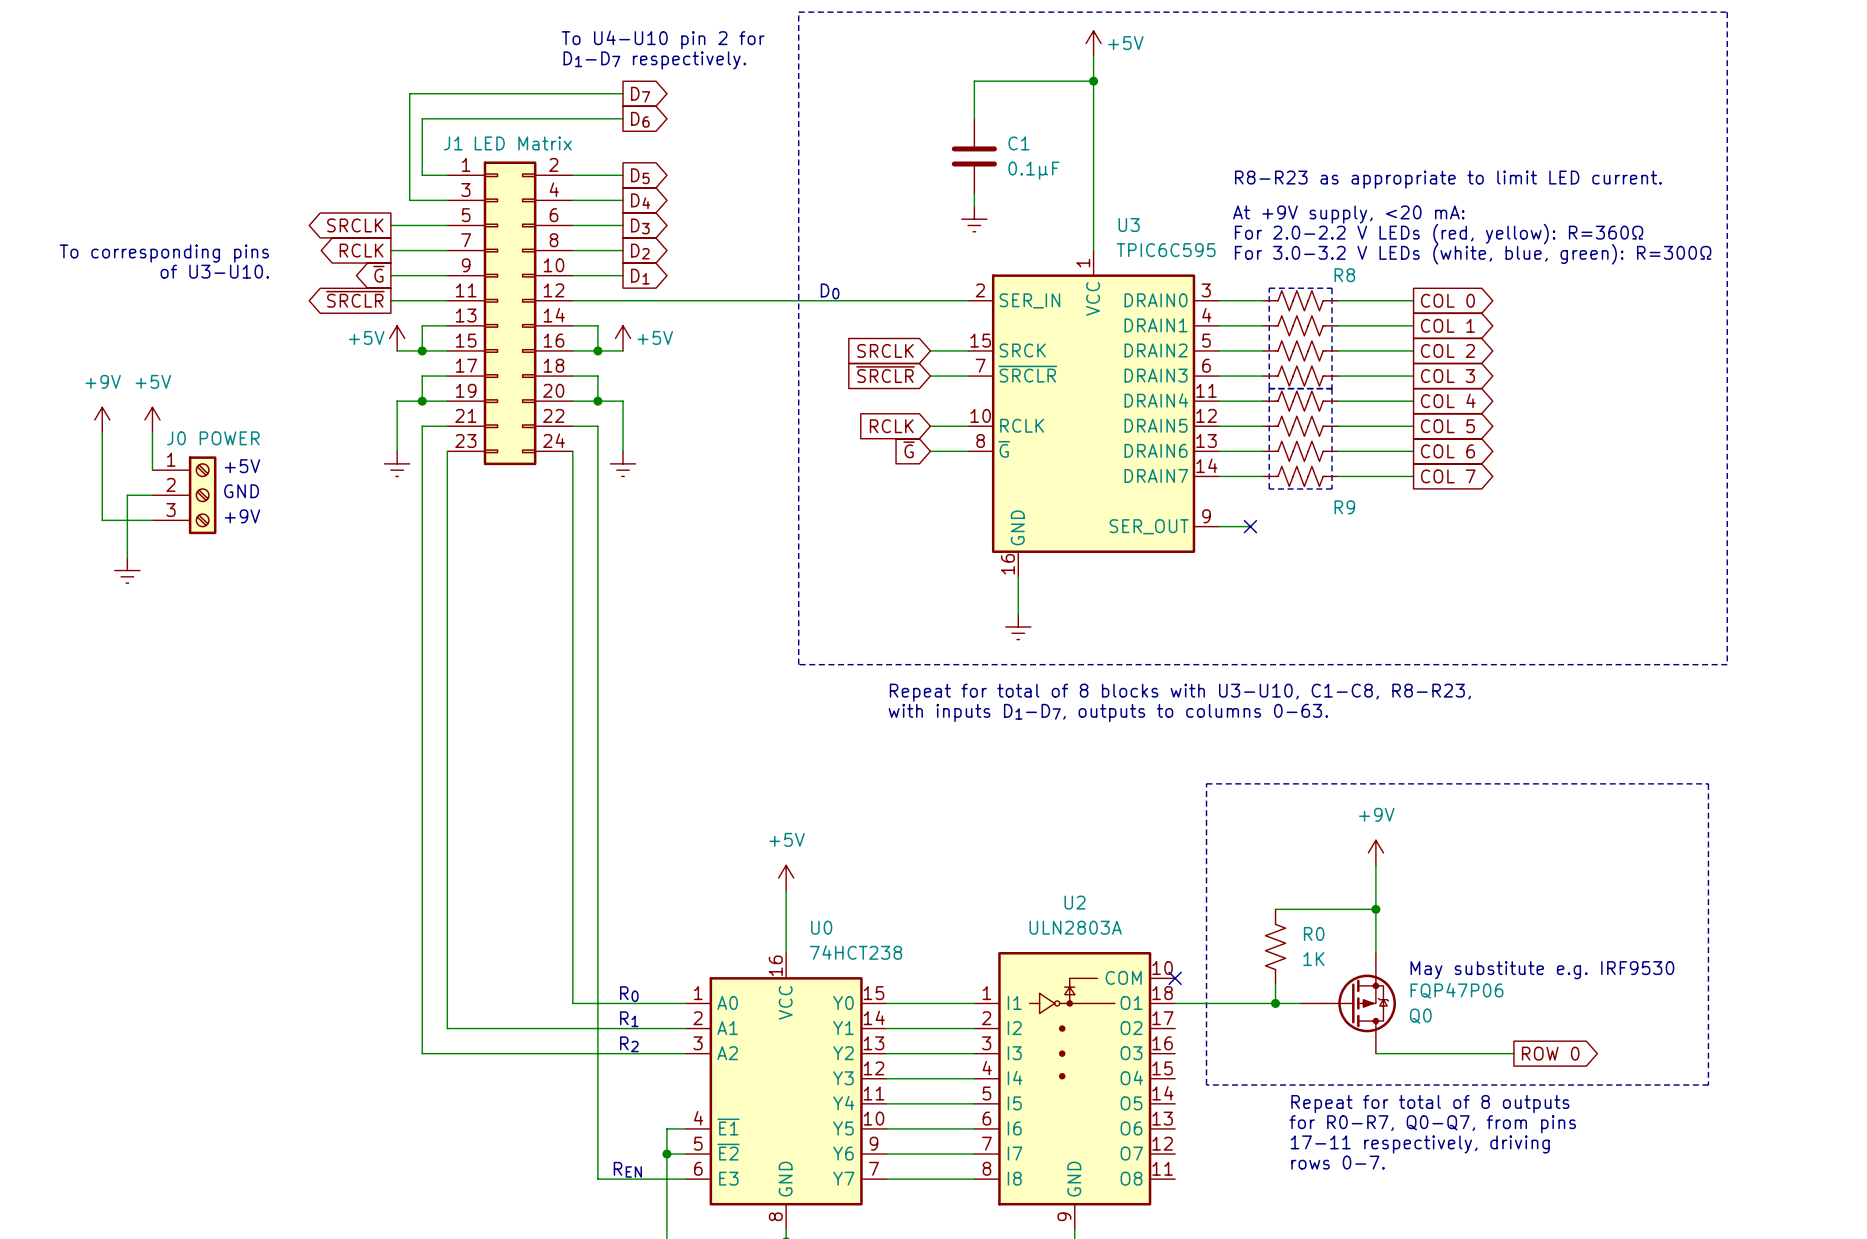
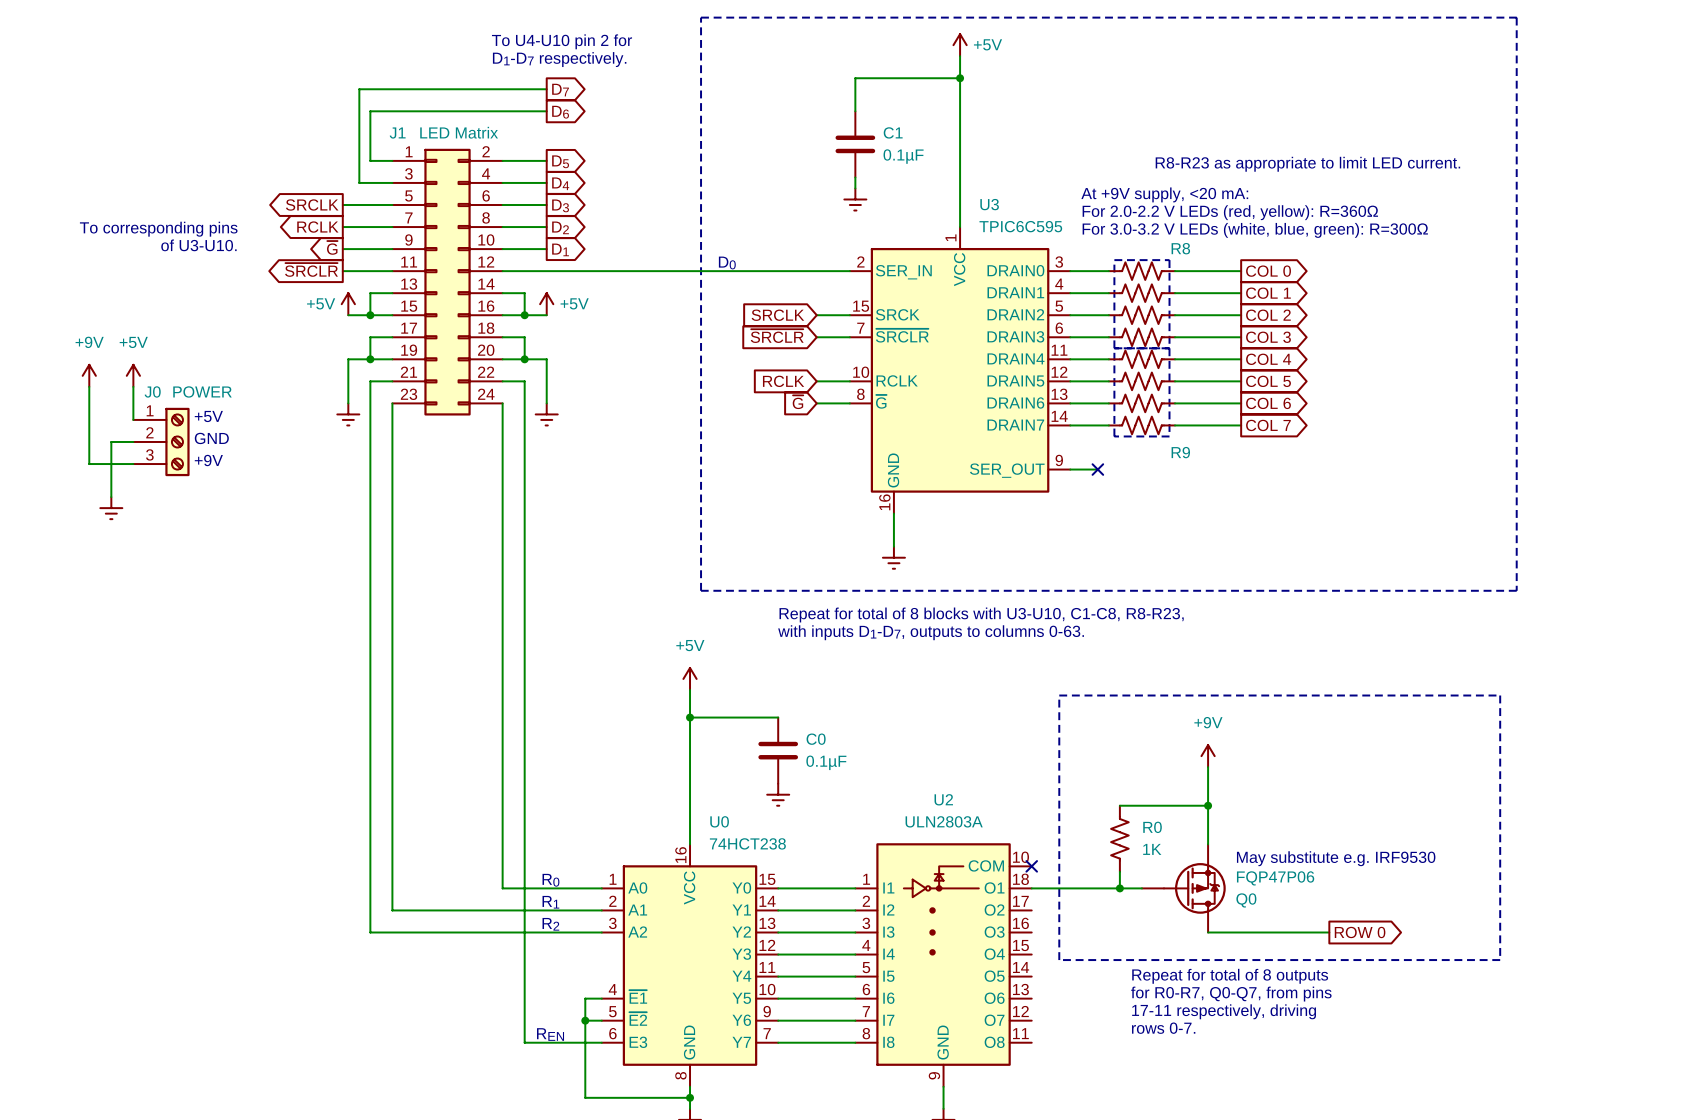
wire: none -> (690, 689) (690, 789)
wire: none -> (690, 717) (778, 717)
junction: none -> (690, 717)
C0: none -> 0.1µF (778, 750)
power symbol position: +5V (786, 877) -> +5V (690, 678)
power symbol: none -> (778, 794)

